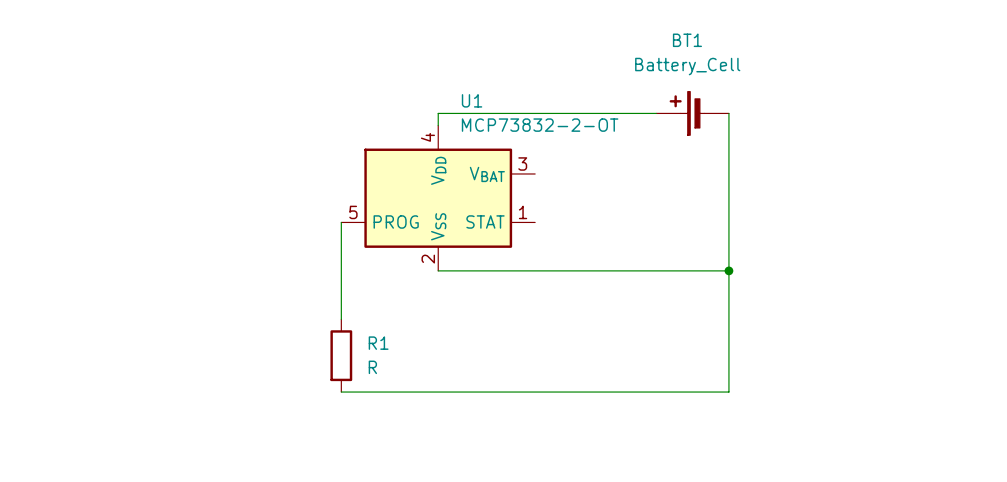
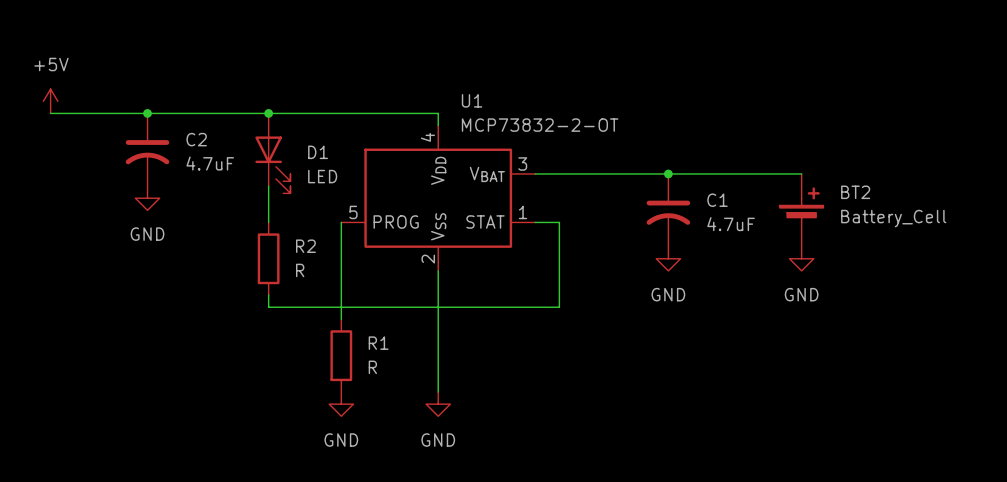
power symbol: none -> +5V (50, 101)
junction: none -> (147, 113)
junction: none -> (268, 113)
wire: (438, 113) (656, 113) -> (438, 113) (50, 113)
BT1: Battery_Cell (692, 113) -> none
wire: (728, 113) (728, 392) (341, 392) -> none
C2: none -> 4.7uF (147, 149)
D1: none -> LED (272, 153)
wire: none -> (535, 173) (801, 173)
junction: none -> (668, 173)
wire: none -> (268, 186) (268, 222)
power symbol: none -> GND (147, 198)
C1: none -> 4.7uF (668, 210)
BT2: none -> Battery_Cell (801, 210)
wire: none -> (535, 222) (559, 222) (559, 307) (268, 307) (268, 295)
R2: none -> R (268, 258)
power symbol: none -> GND (668, 258)
power symbol: none -> GND (801, 258)
wire: (438, 270) (728, 270) -> (438, 270) (438, 392)
junction: (728, 270) -> none
power symbol: none -> GND (341, 404)
power symbol: none -> GND (438, 404)

